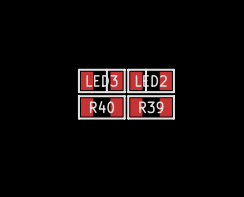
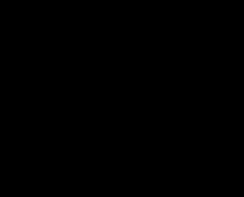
LED3: (101, 80) -> none
LED2: (151, 80) -> none
R40: (101, 107) -> none
R39: (151, 107) -> none

